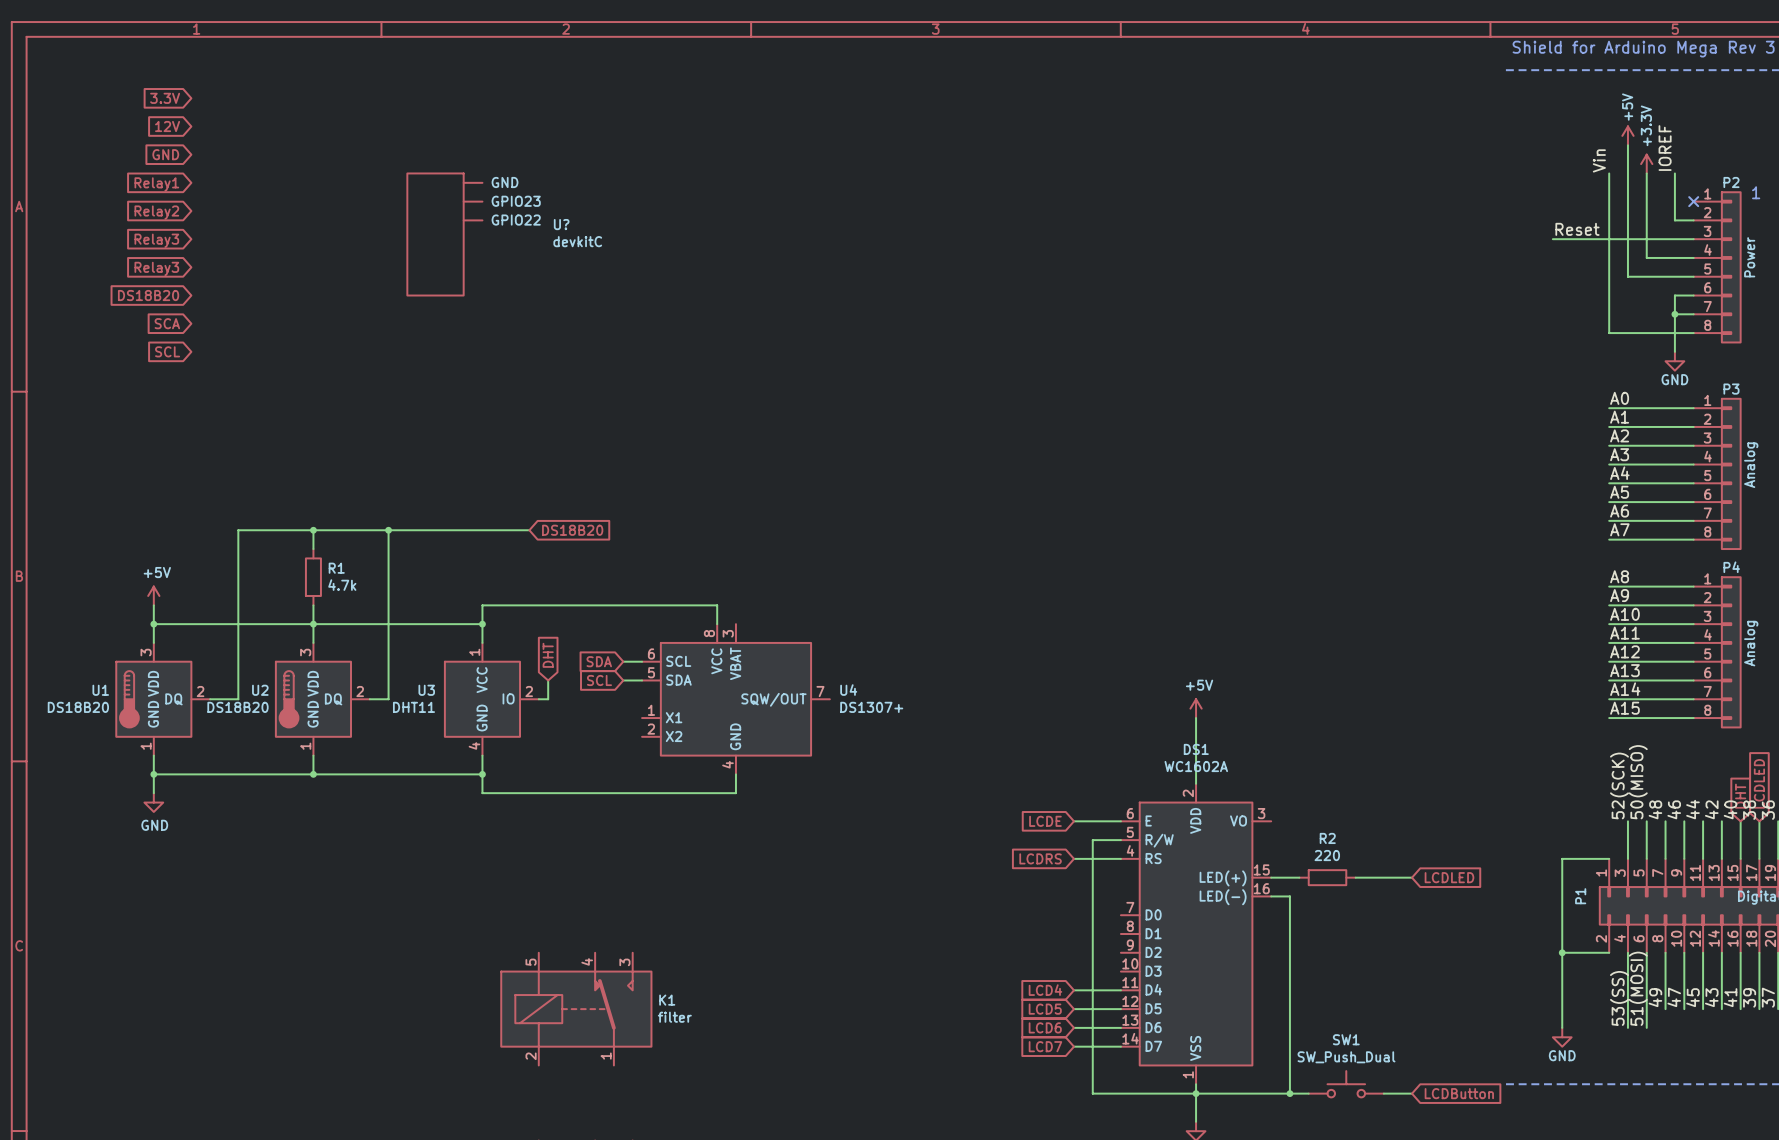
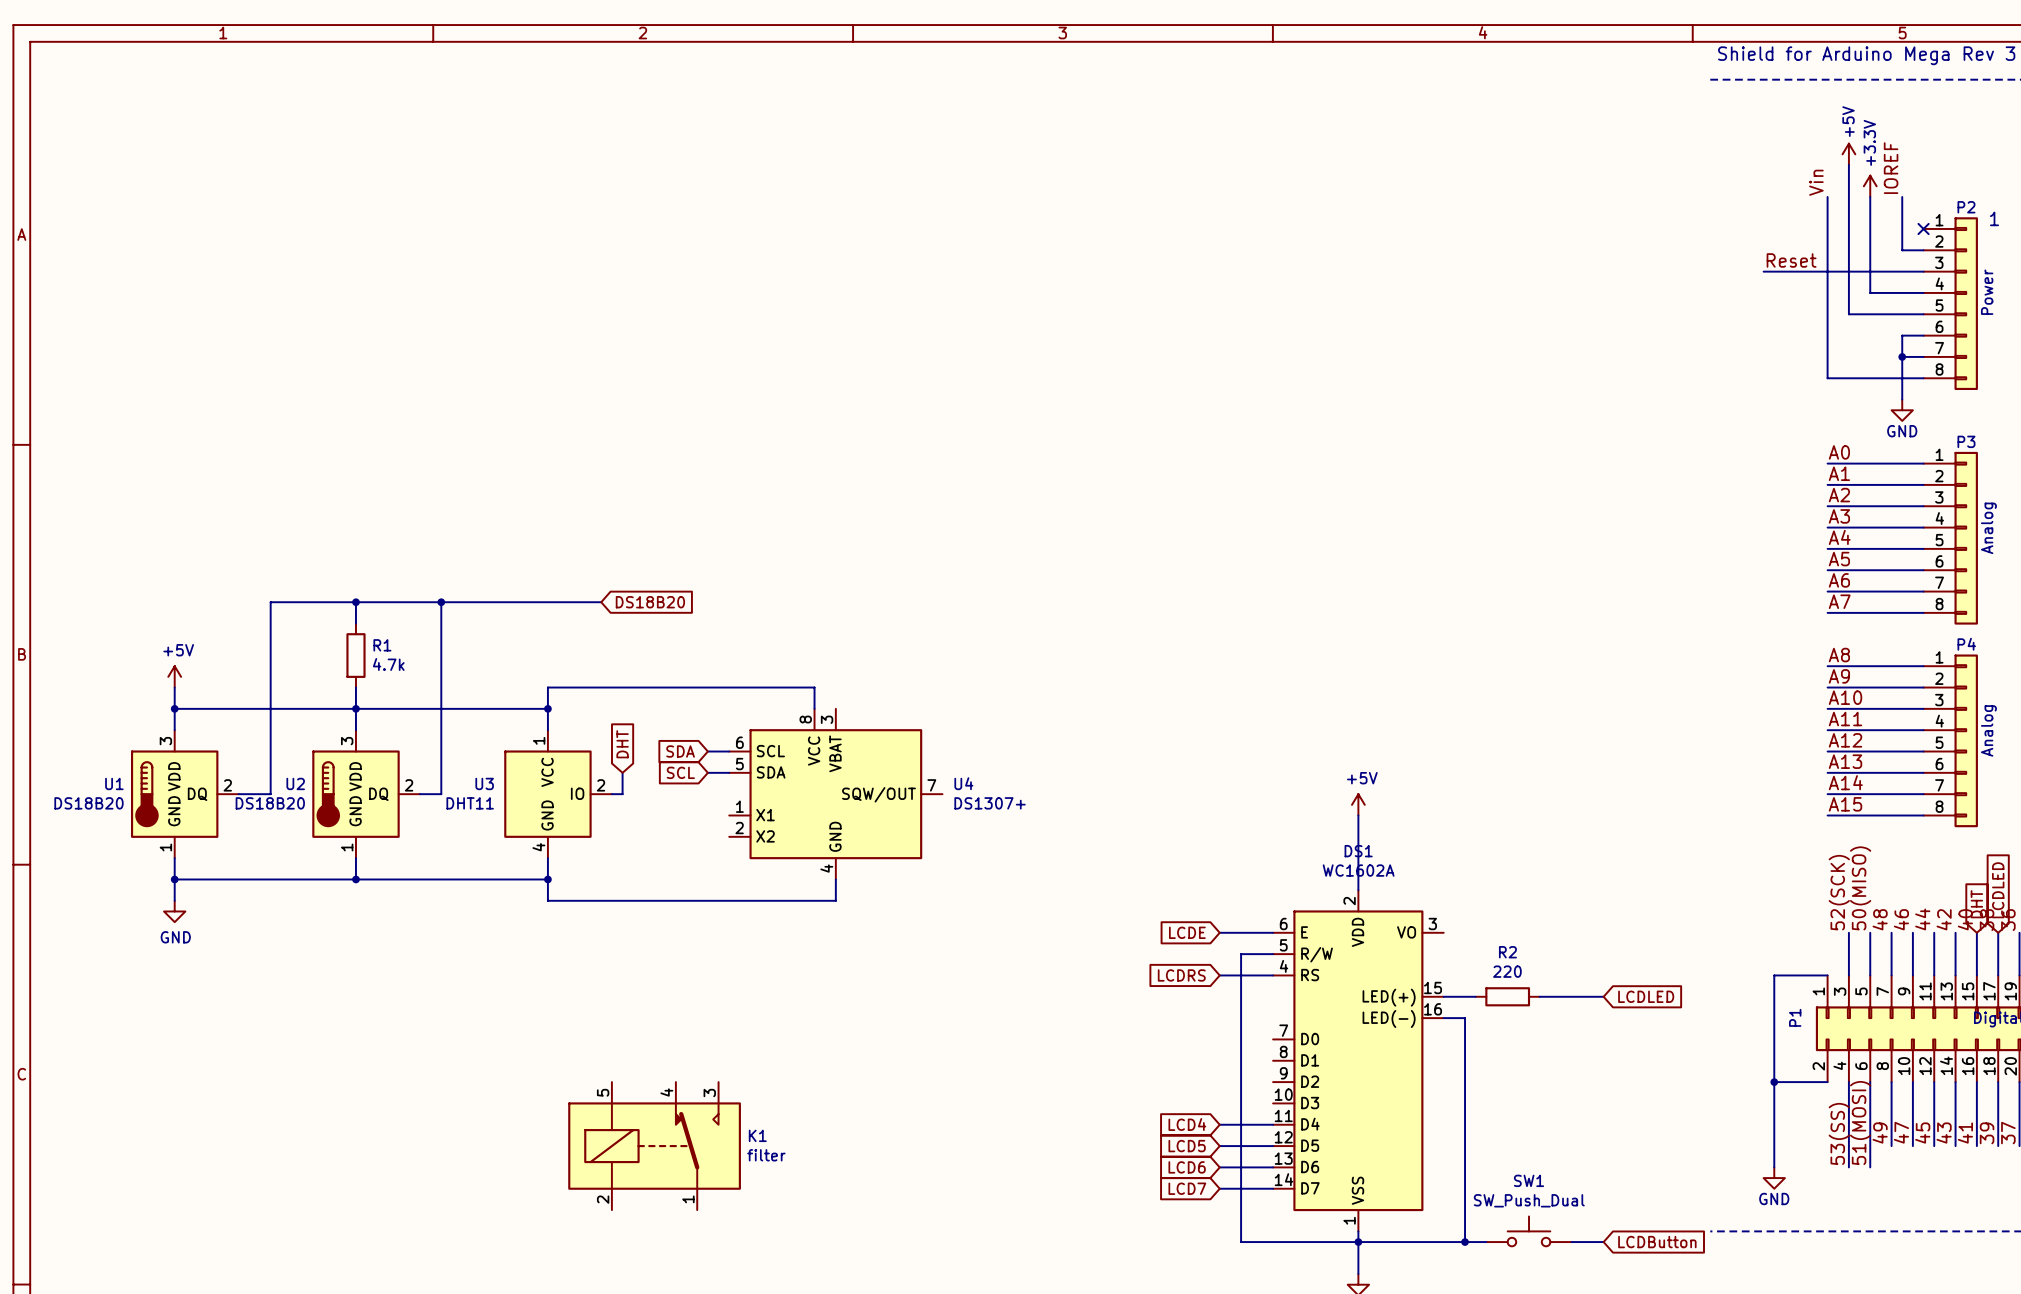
global label: 3.3V (165, 98) -> none
global label: 12V (167, 126) -> none
global label: GND (165, 154) -> none
global label: Relay1 (156, 184) -> none
global label: Relay2 (156, 212) -> none
U?: devkitC (444, 234) -> none
global label: Relay3 (156, 240) -> none
global label: Relay3 (156, 268) -> none
global label: DS18B20 (148, 295) -> none
global label: SCA (167, 323) -> none
global label: SCL (167, 351) -> none

